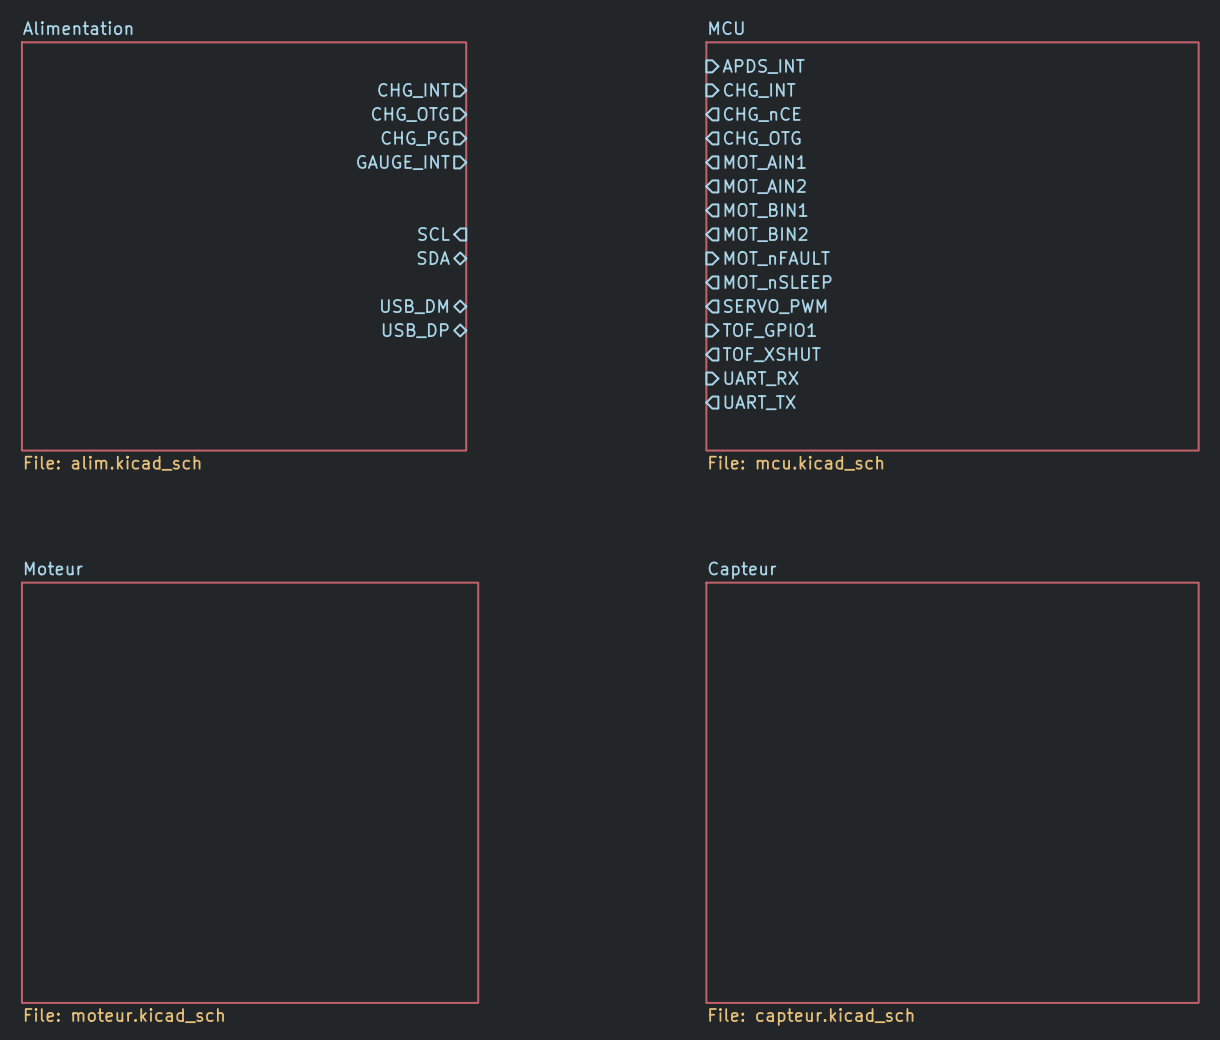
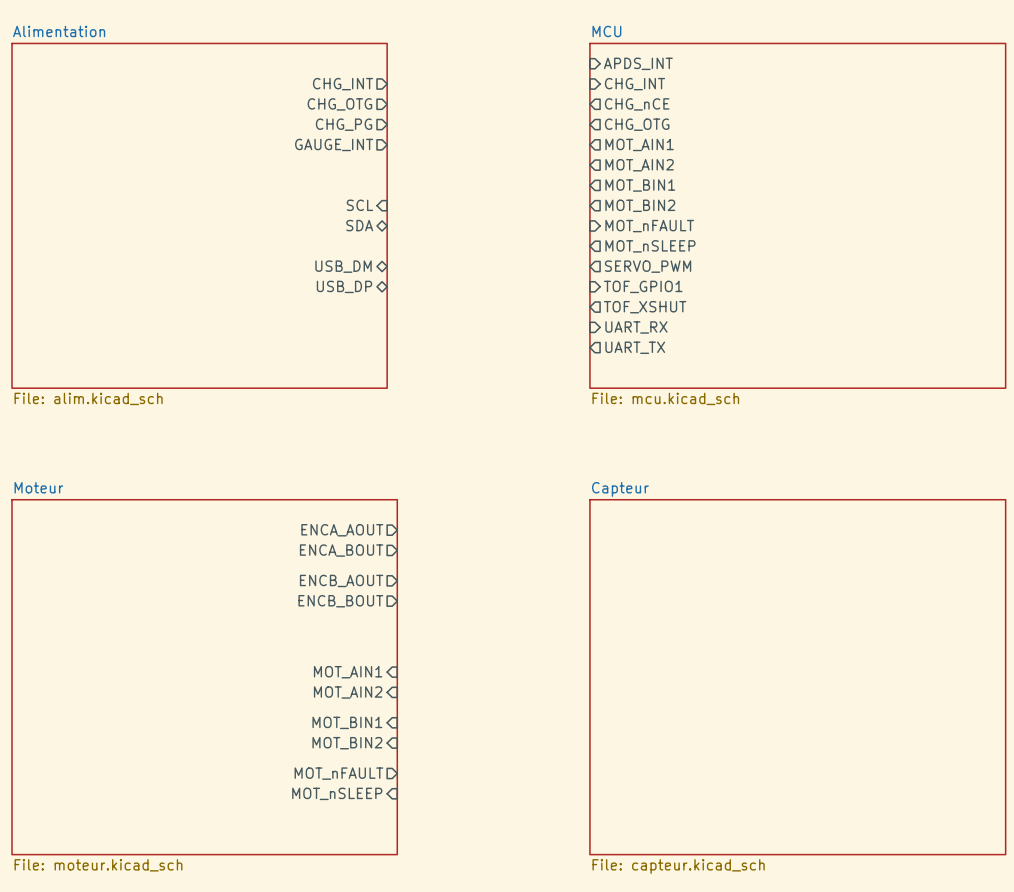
sheet pin: none -> ENCA_AOUT (342, 530)
sheet pin: none -> ENCA_BOUT (341, 550)
sheet pin: none -> ENCB_AOUT (341, 580)
sheet pin: none -> ENCB_BOUT (340, 601)
sheet pin: none -> MOT_AIN1 (348, 672)
sheet pin: none -> MOT_AIN2 (348, 692)
sheet pin: none -> MOT_BIN1 (347, 722)
sheet pin: none -> MOT_BIN2 (347, 743)
sheet pin: none -> MOT_nFAULT (338, 773)
sheet pin: none -> MOT_nSLEEP (337, 793)

